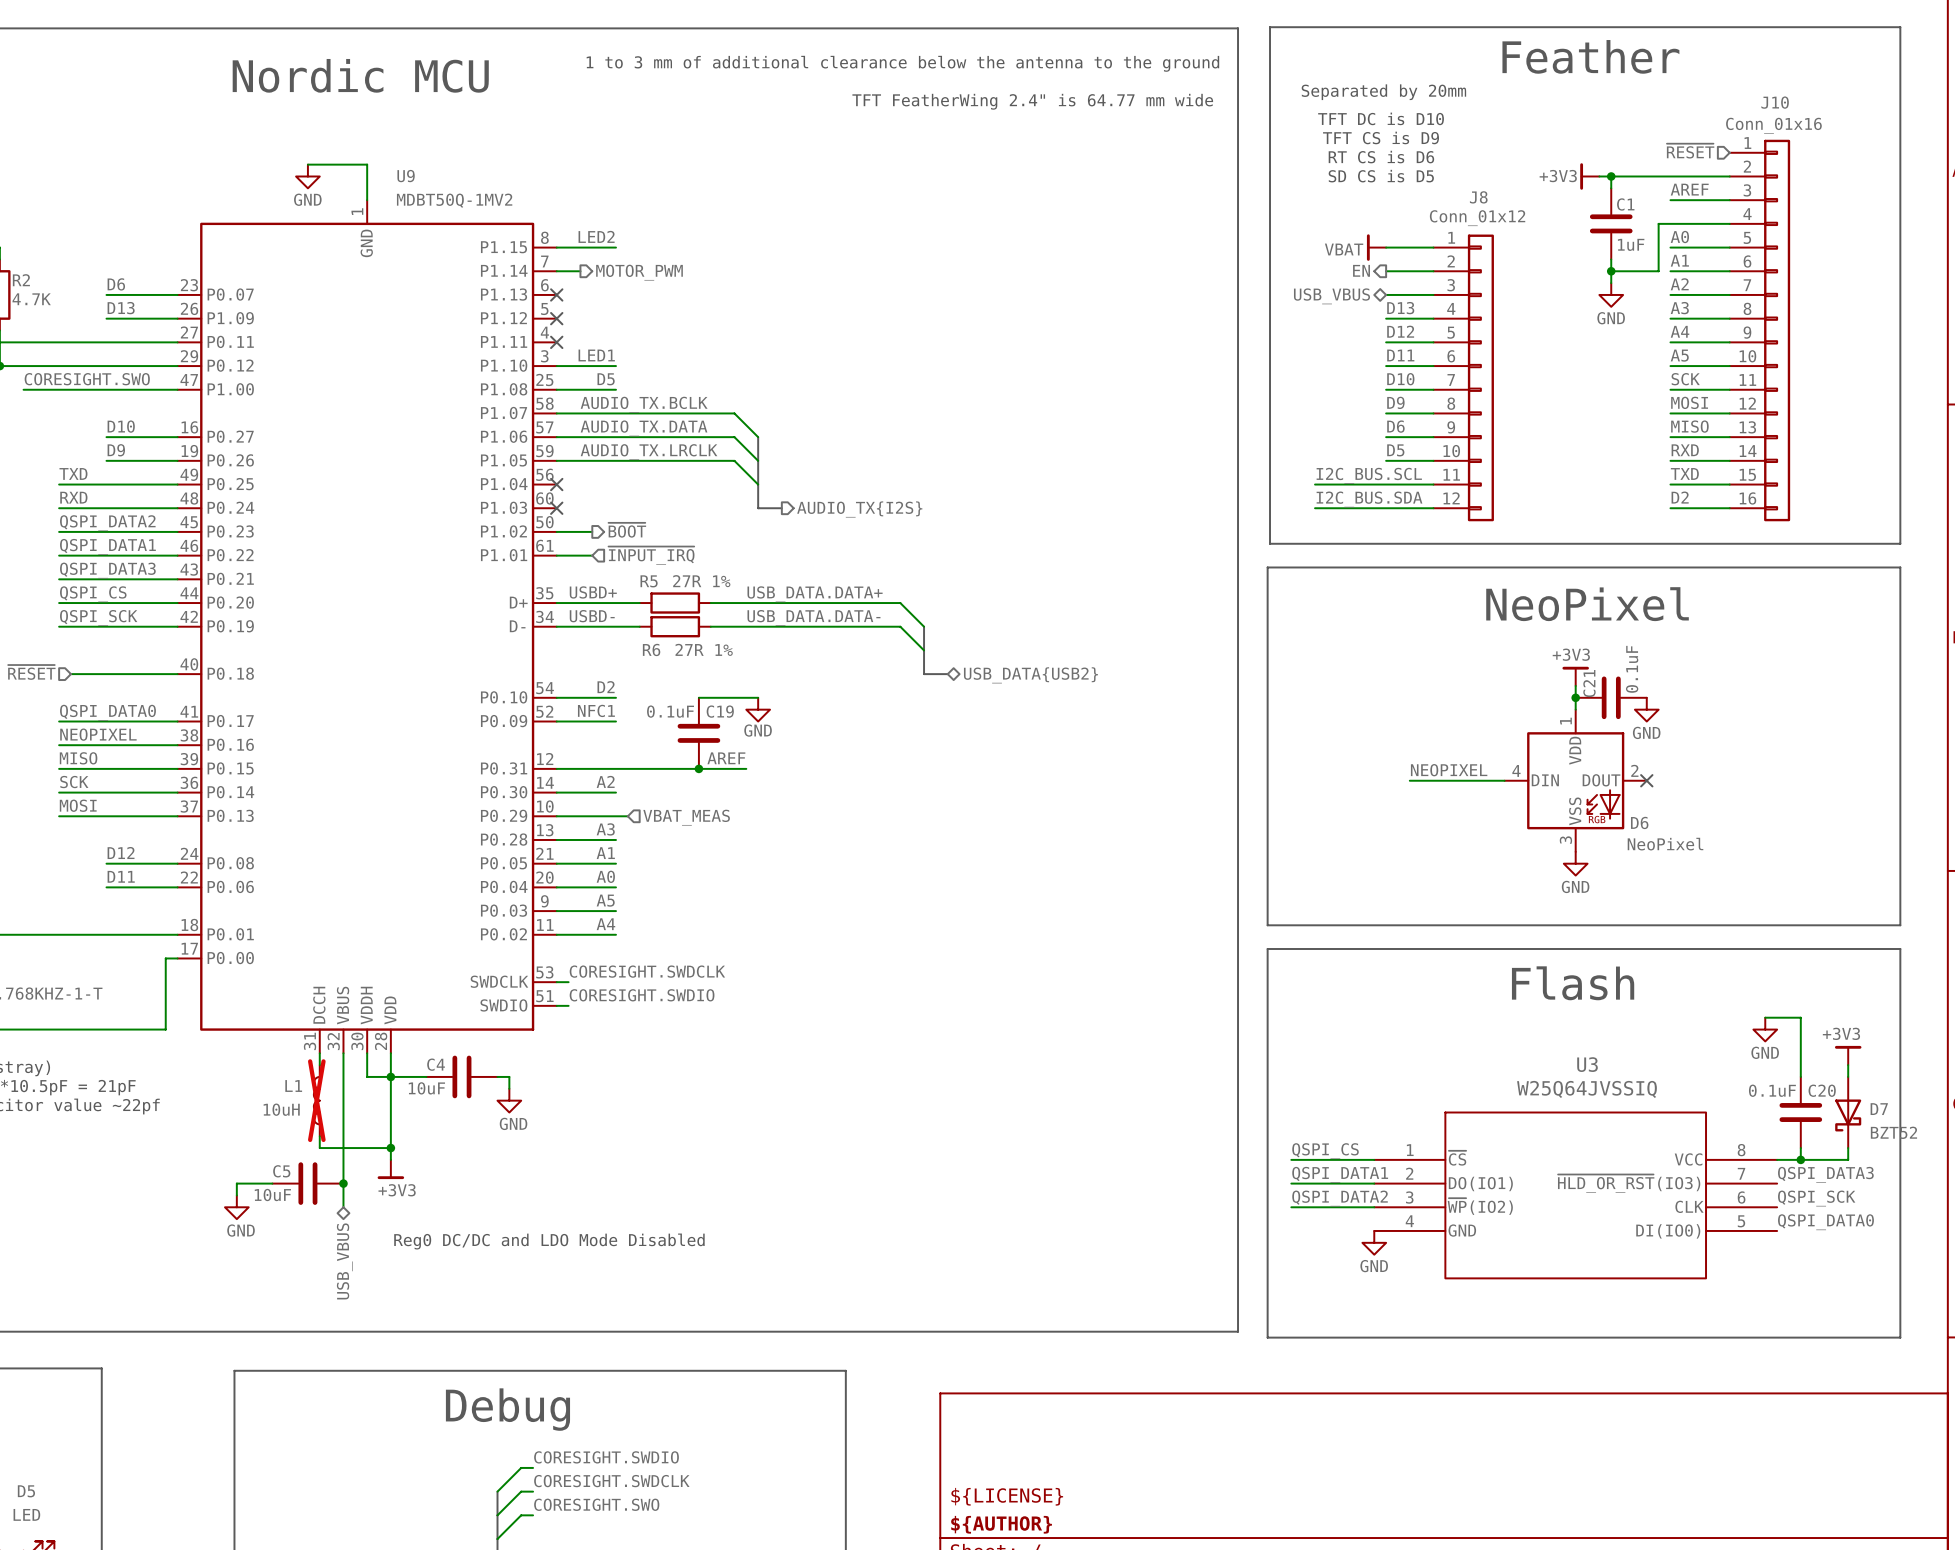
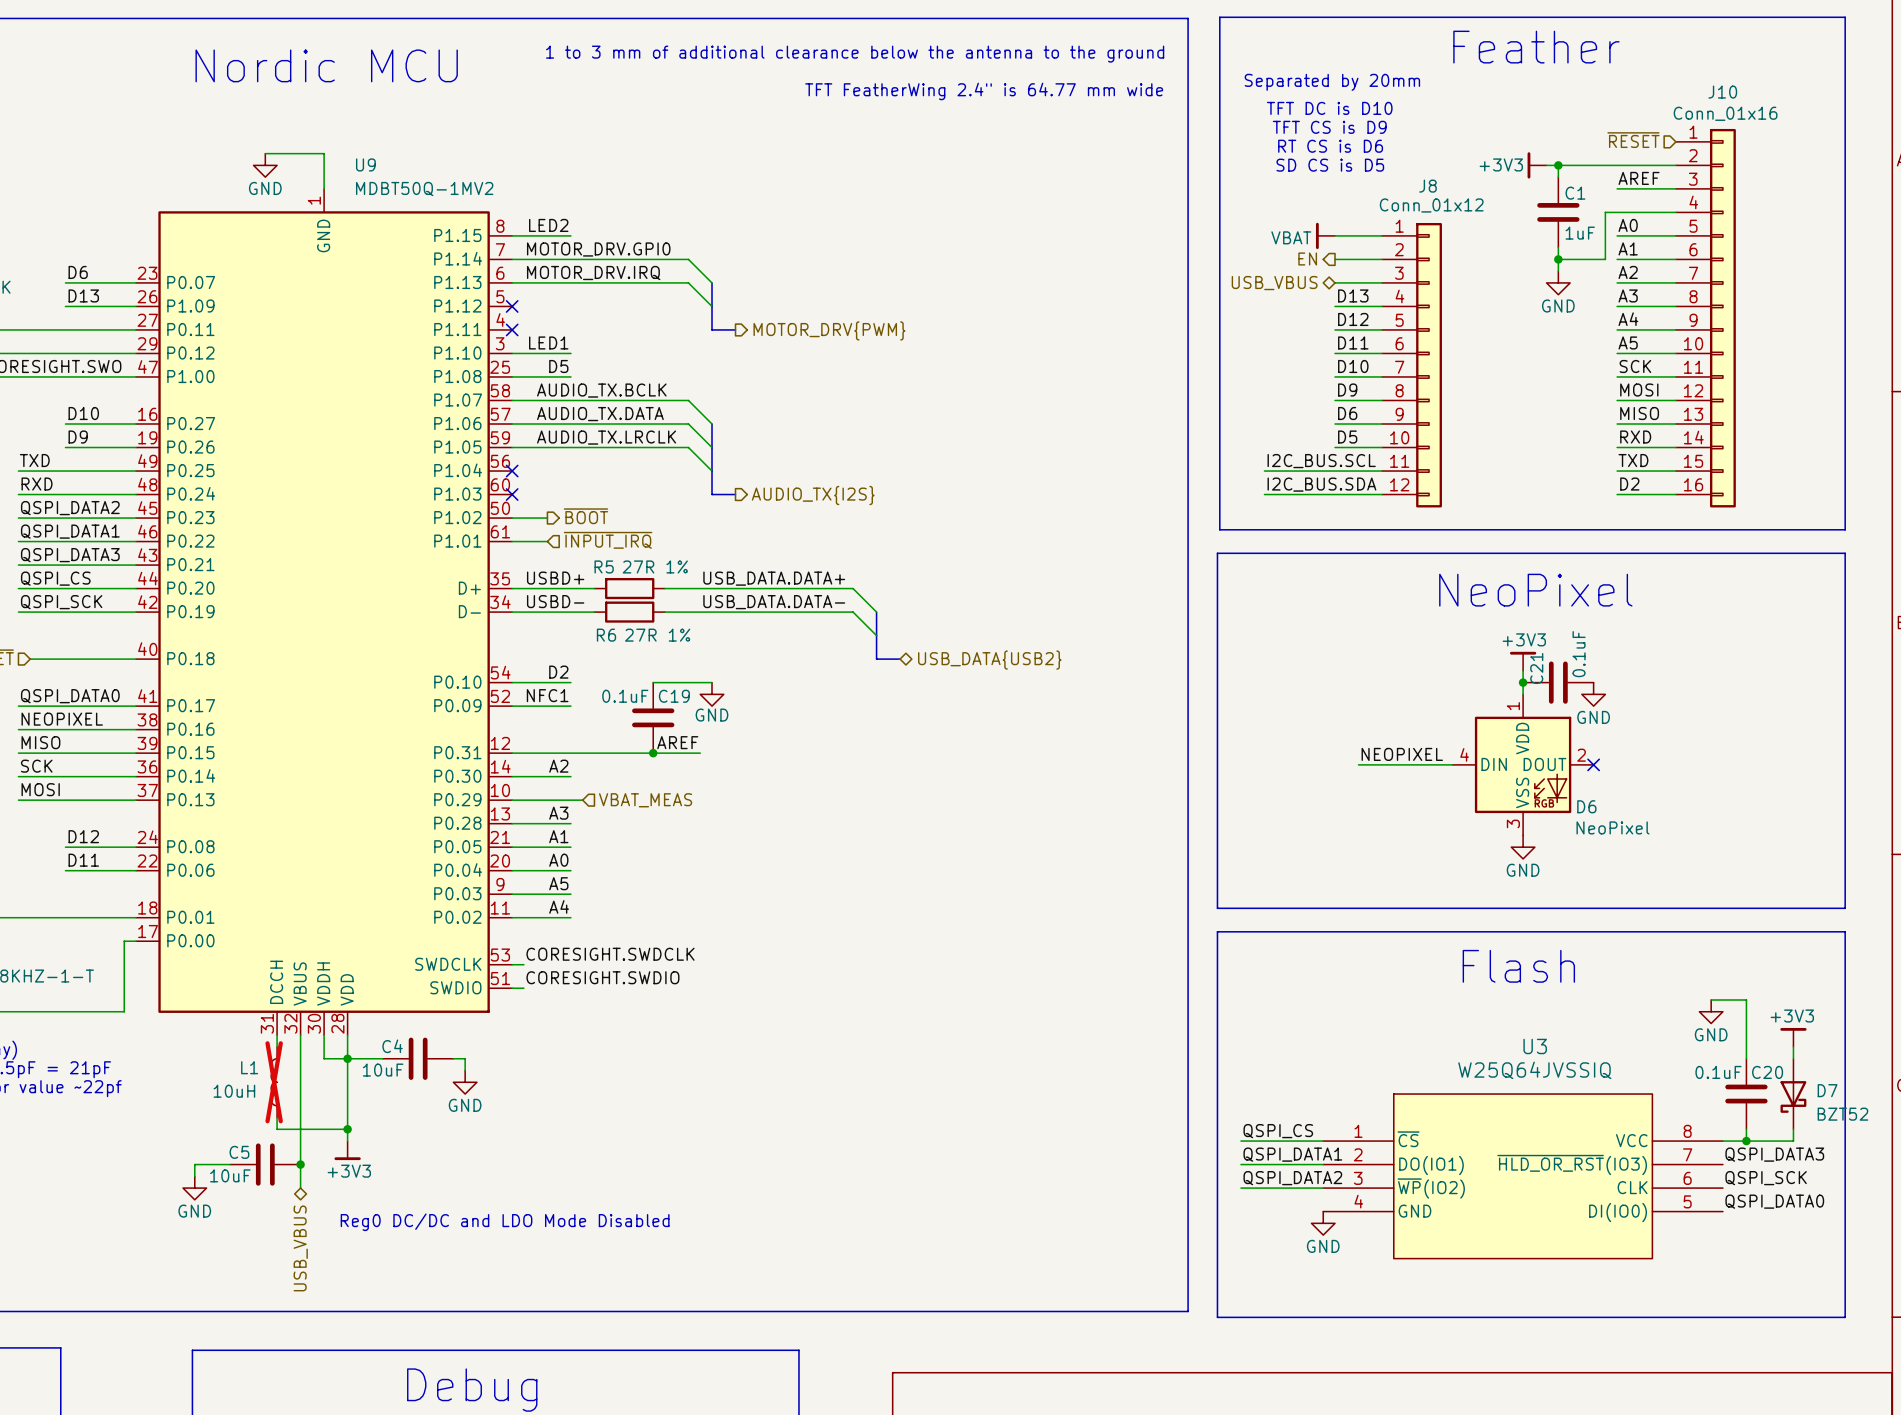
label: none -> MOTOR_DRV.GPI0 (598, 249)
wire: none -> (535, 259) (688, 259) (712, 282)
hierarchical label: MOTOR_PWM (639, 272) -> none
label: none -> MOTOR_DRV.IRQ (593, 273)
wire: none -> (512, 282) (688, 282) (712, 306)
no-connect mark: (556, 294) -> none
bus: none -> (712, 282) (712, 329) (735, 329)
hierarchical label: none -> MOTOR_DRV{PWM} (829, 330)

